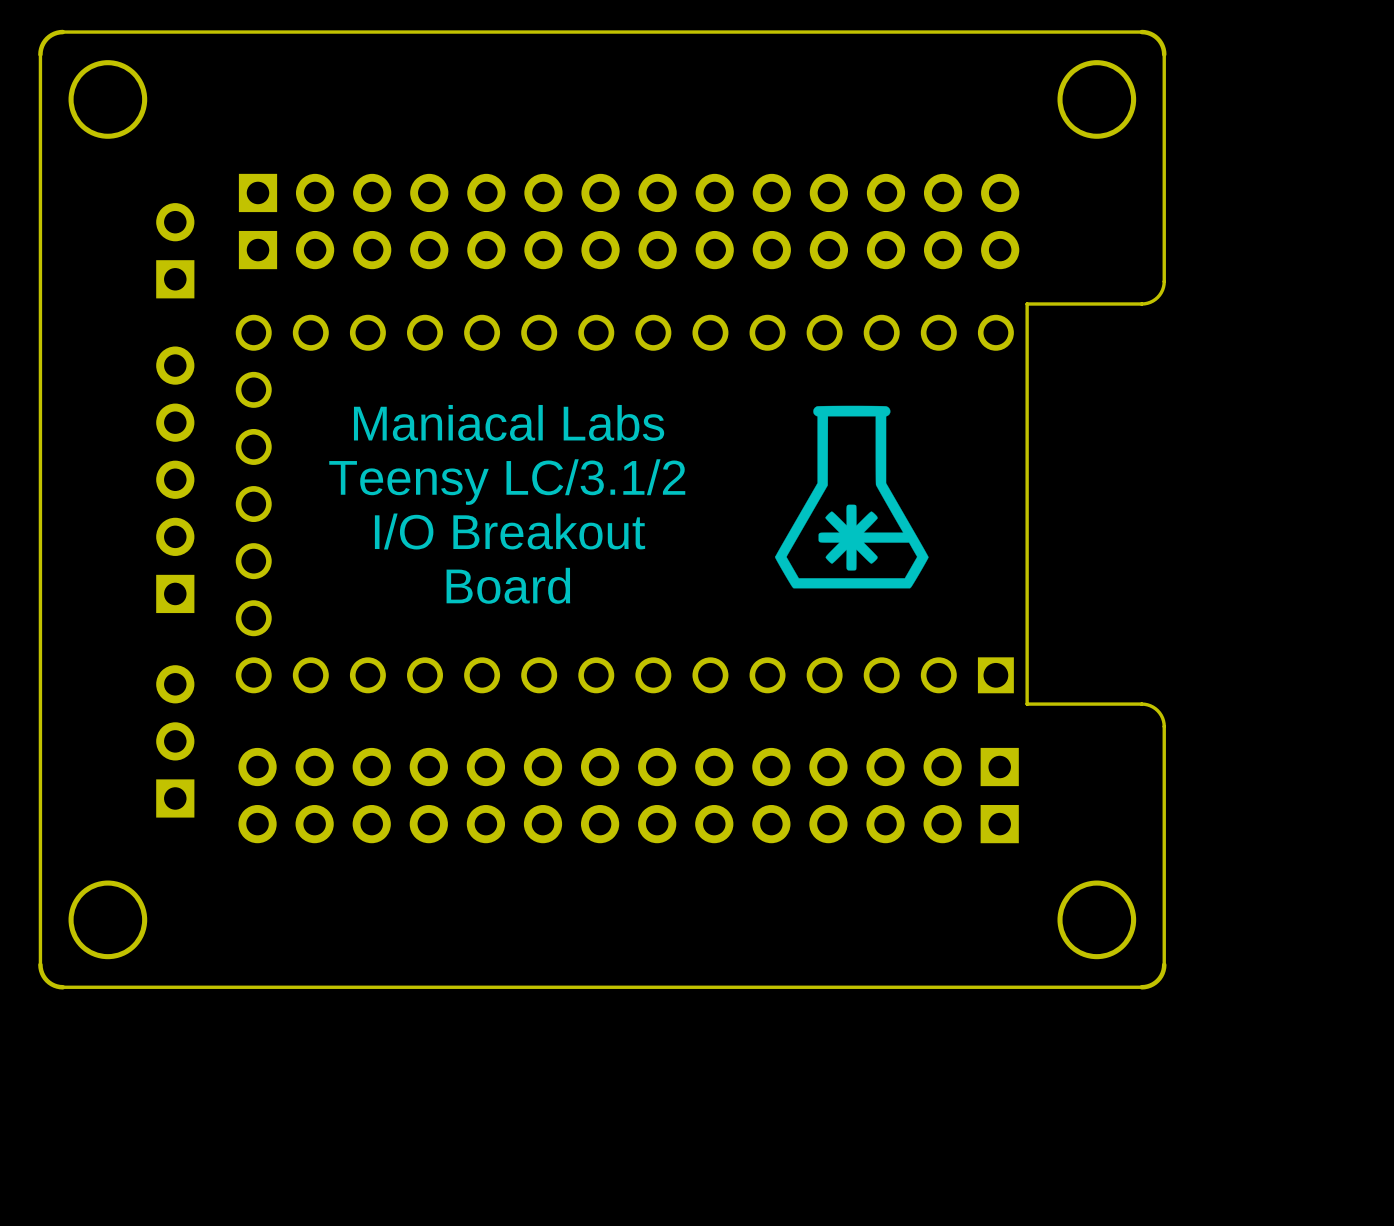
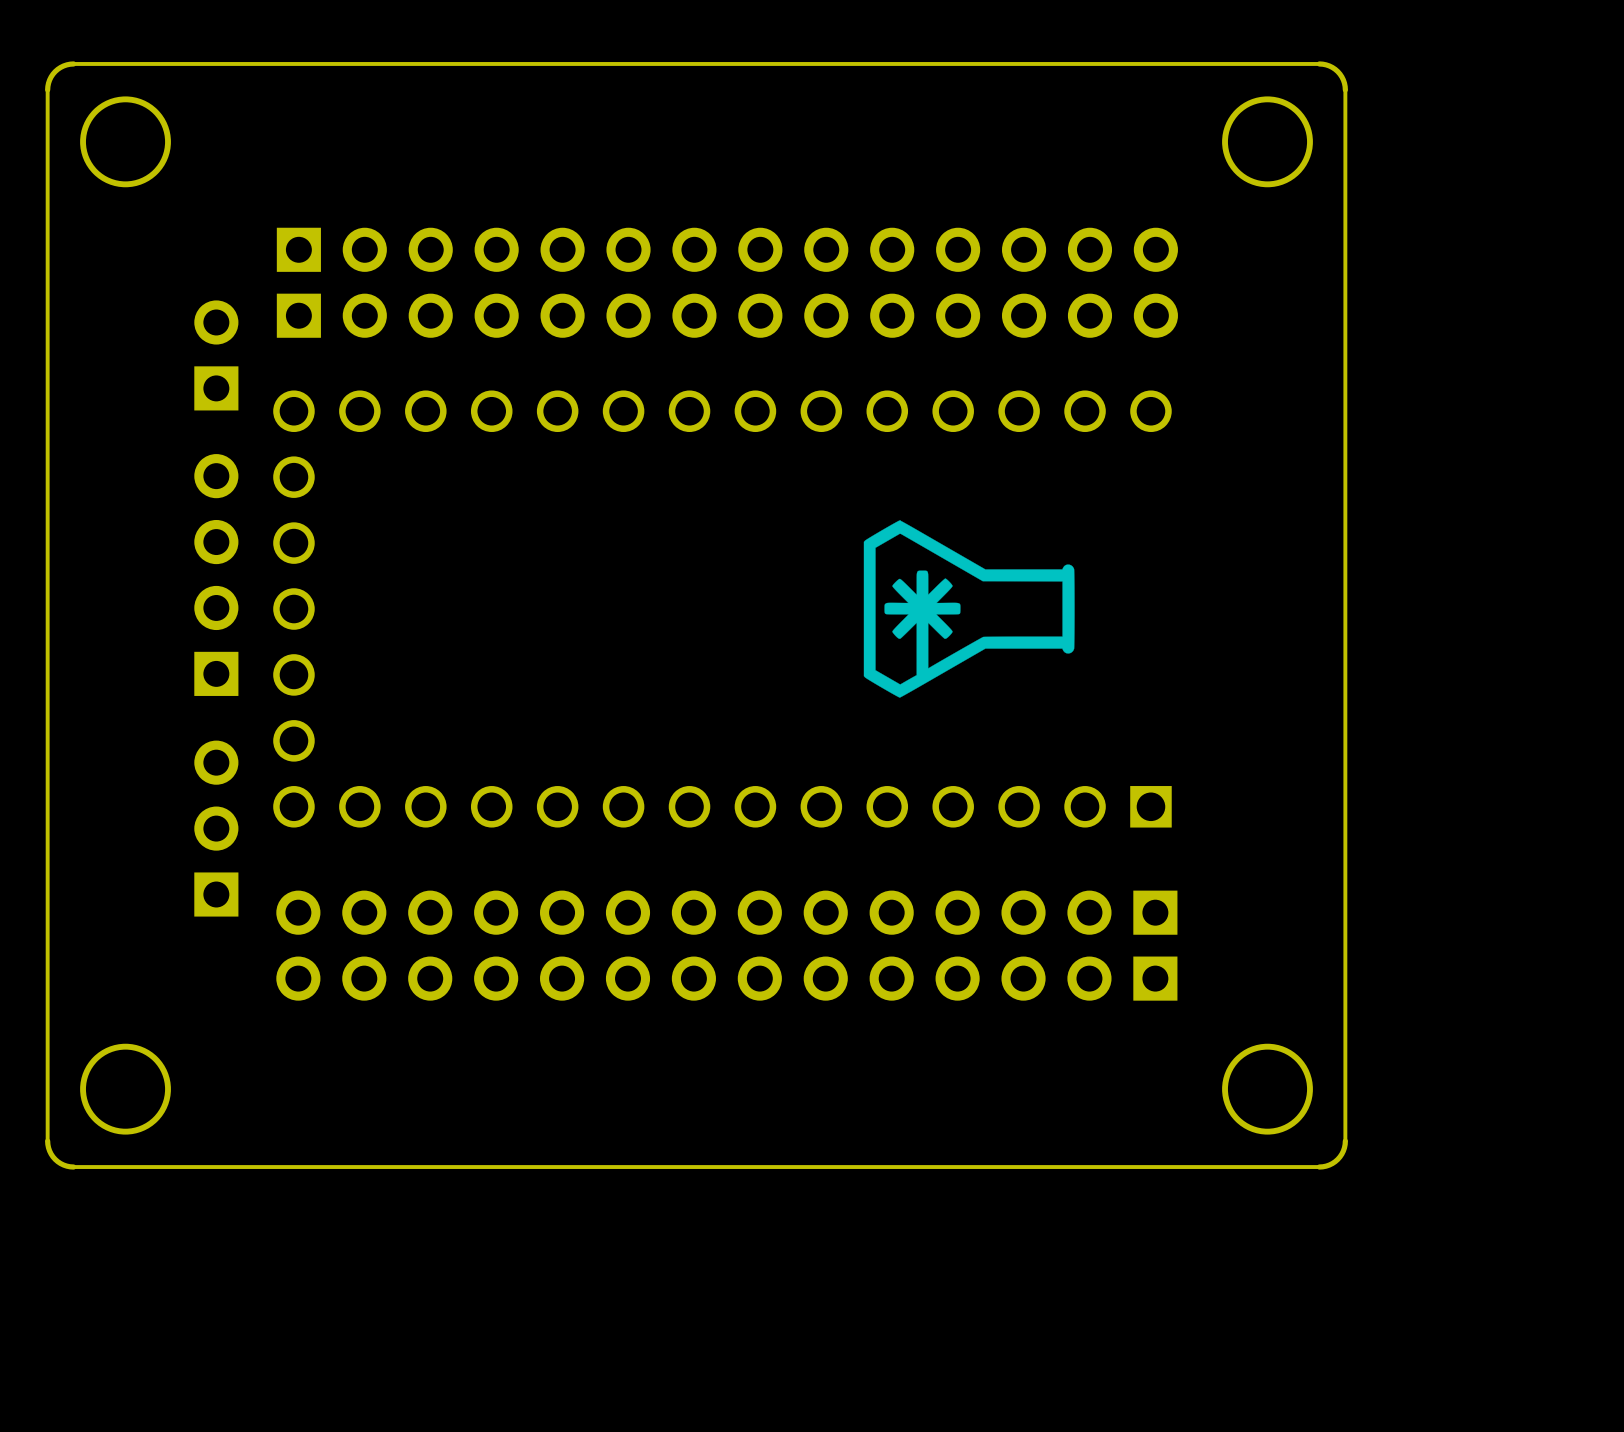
part position: (175, 250) -> (216, 355)
board edge: (1164, 281) (1162, 290) (1157, 297) (1144, 303) (1027, 304) (1027, 704) (1144, 704) (1157, 710) (1162, 717) (1164, 726) -> (1345, 352) (1345, 865)
part footprint: [156, 346, 195, 614] -> [194, 454, 239, 696]
drawing shape: [775, 405, 929, 589] -> [863, 520, 1075, 698]
text: Maniacal Labs (509, 422) -> none
text: Teensy LC/3.1/2 (507, 482) -> none
text: I/O Breakout (510, 531) -> none
text: Board (508, 585) -> none
part position: (175, 741) -> (216, 828)

